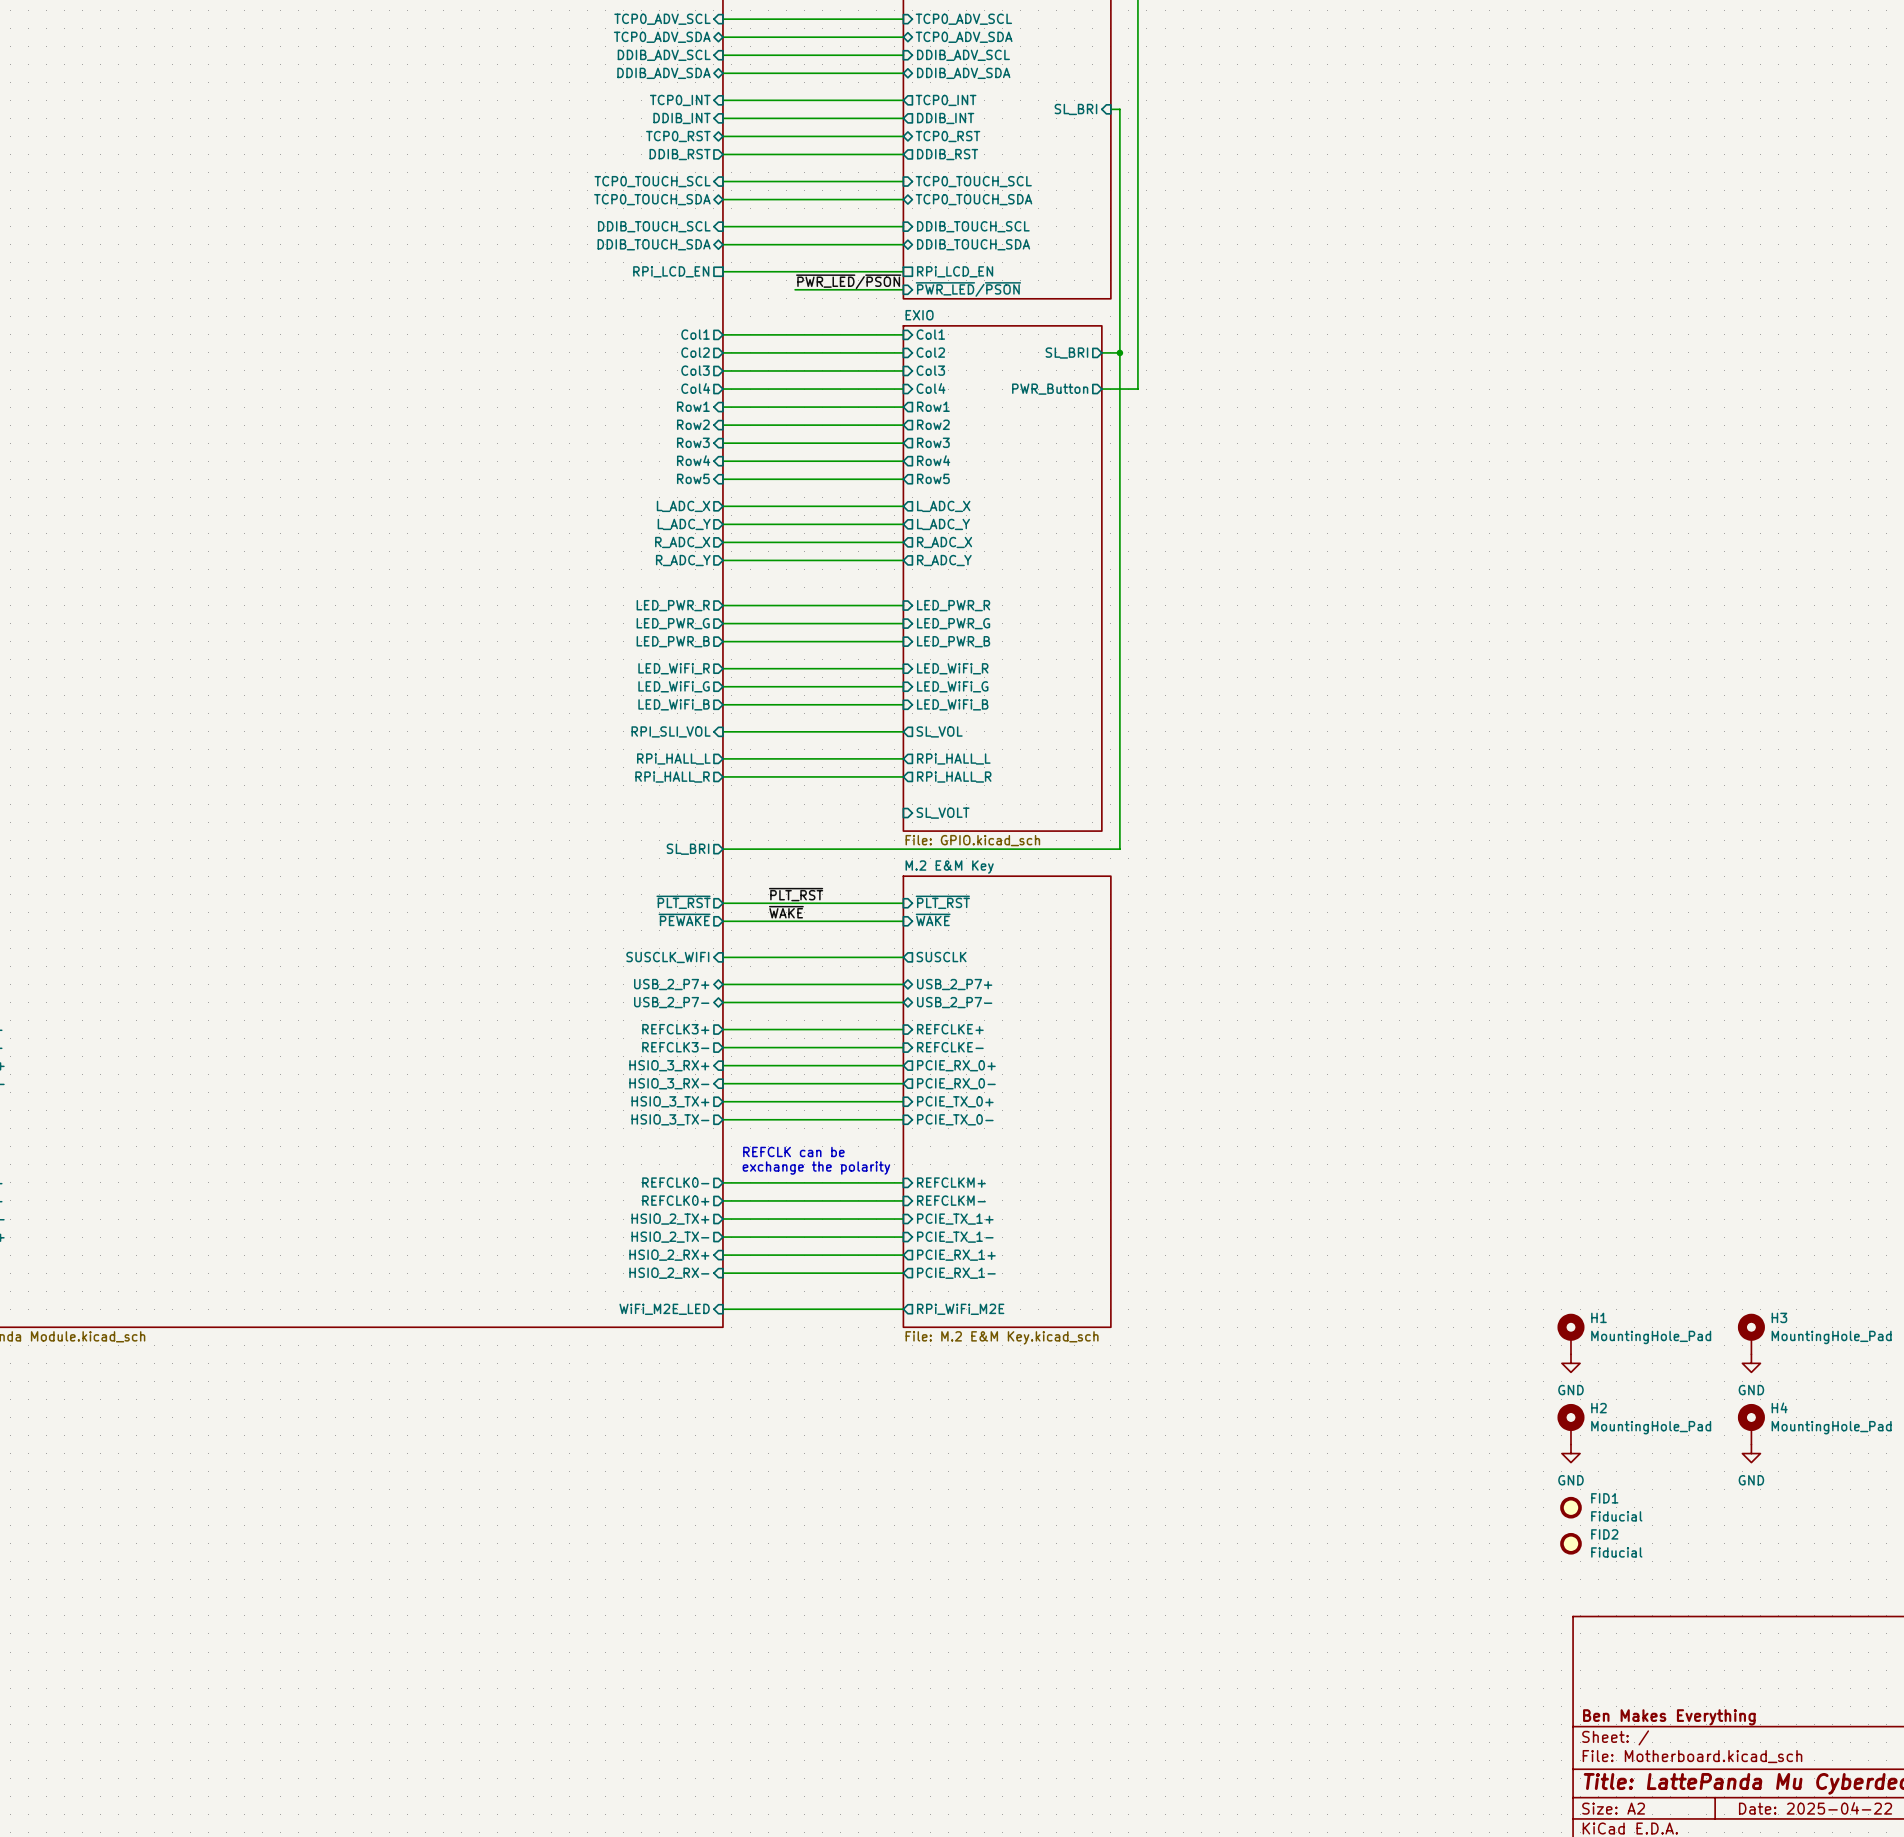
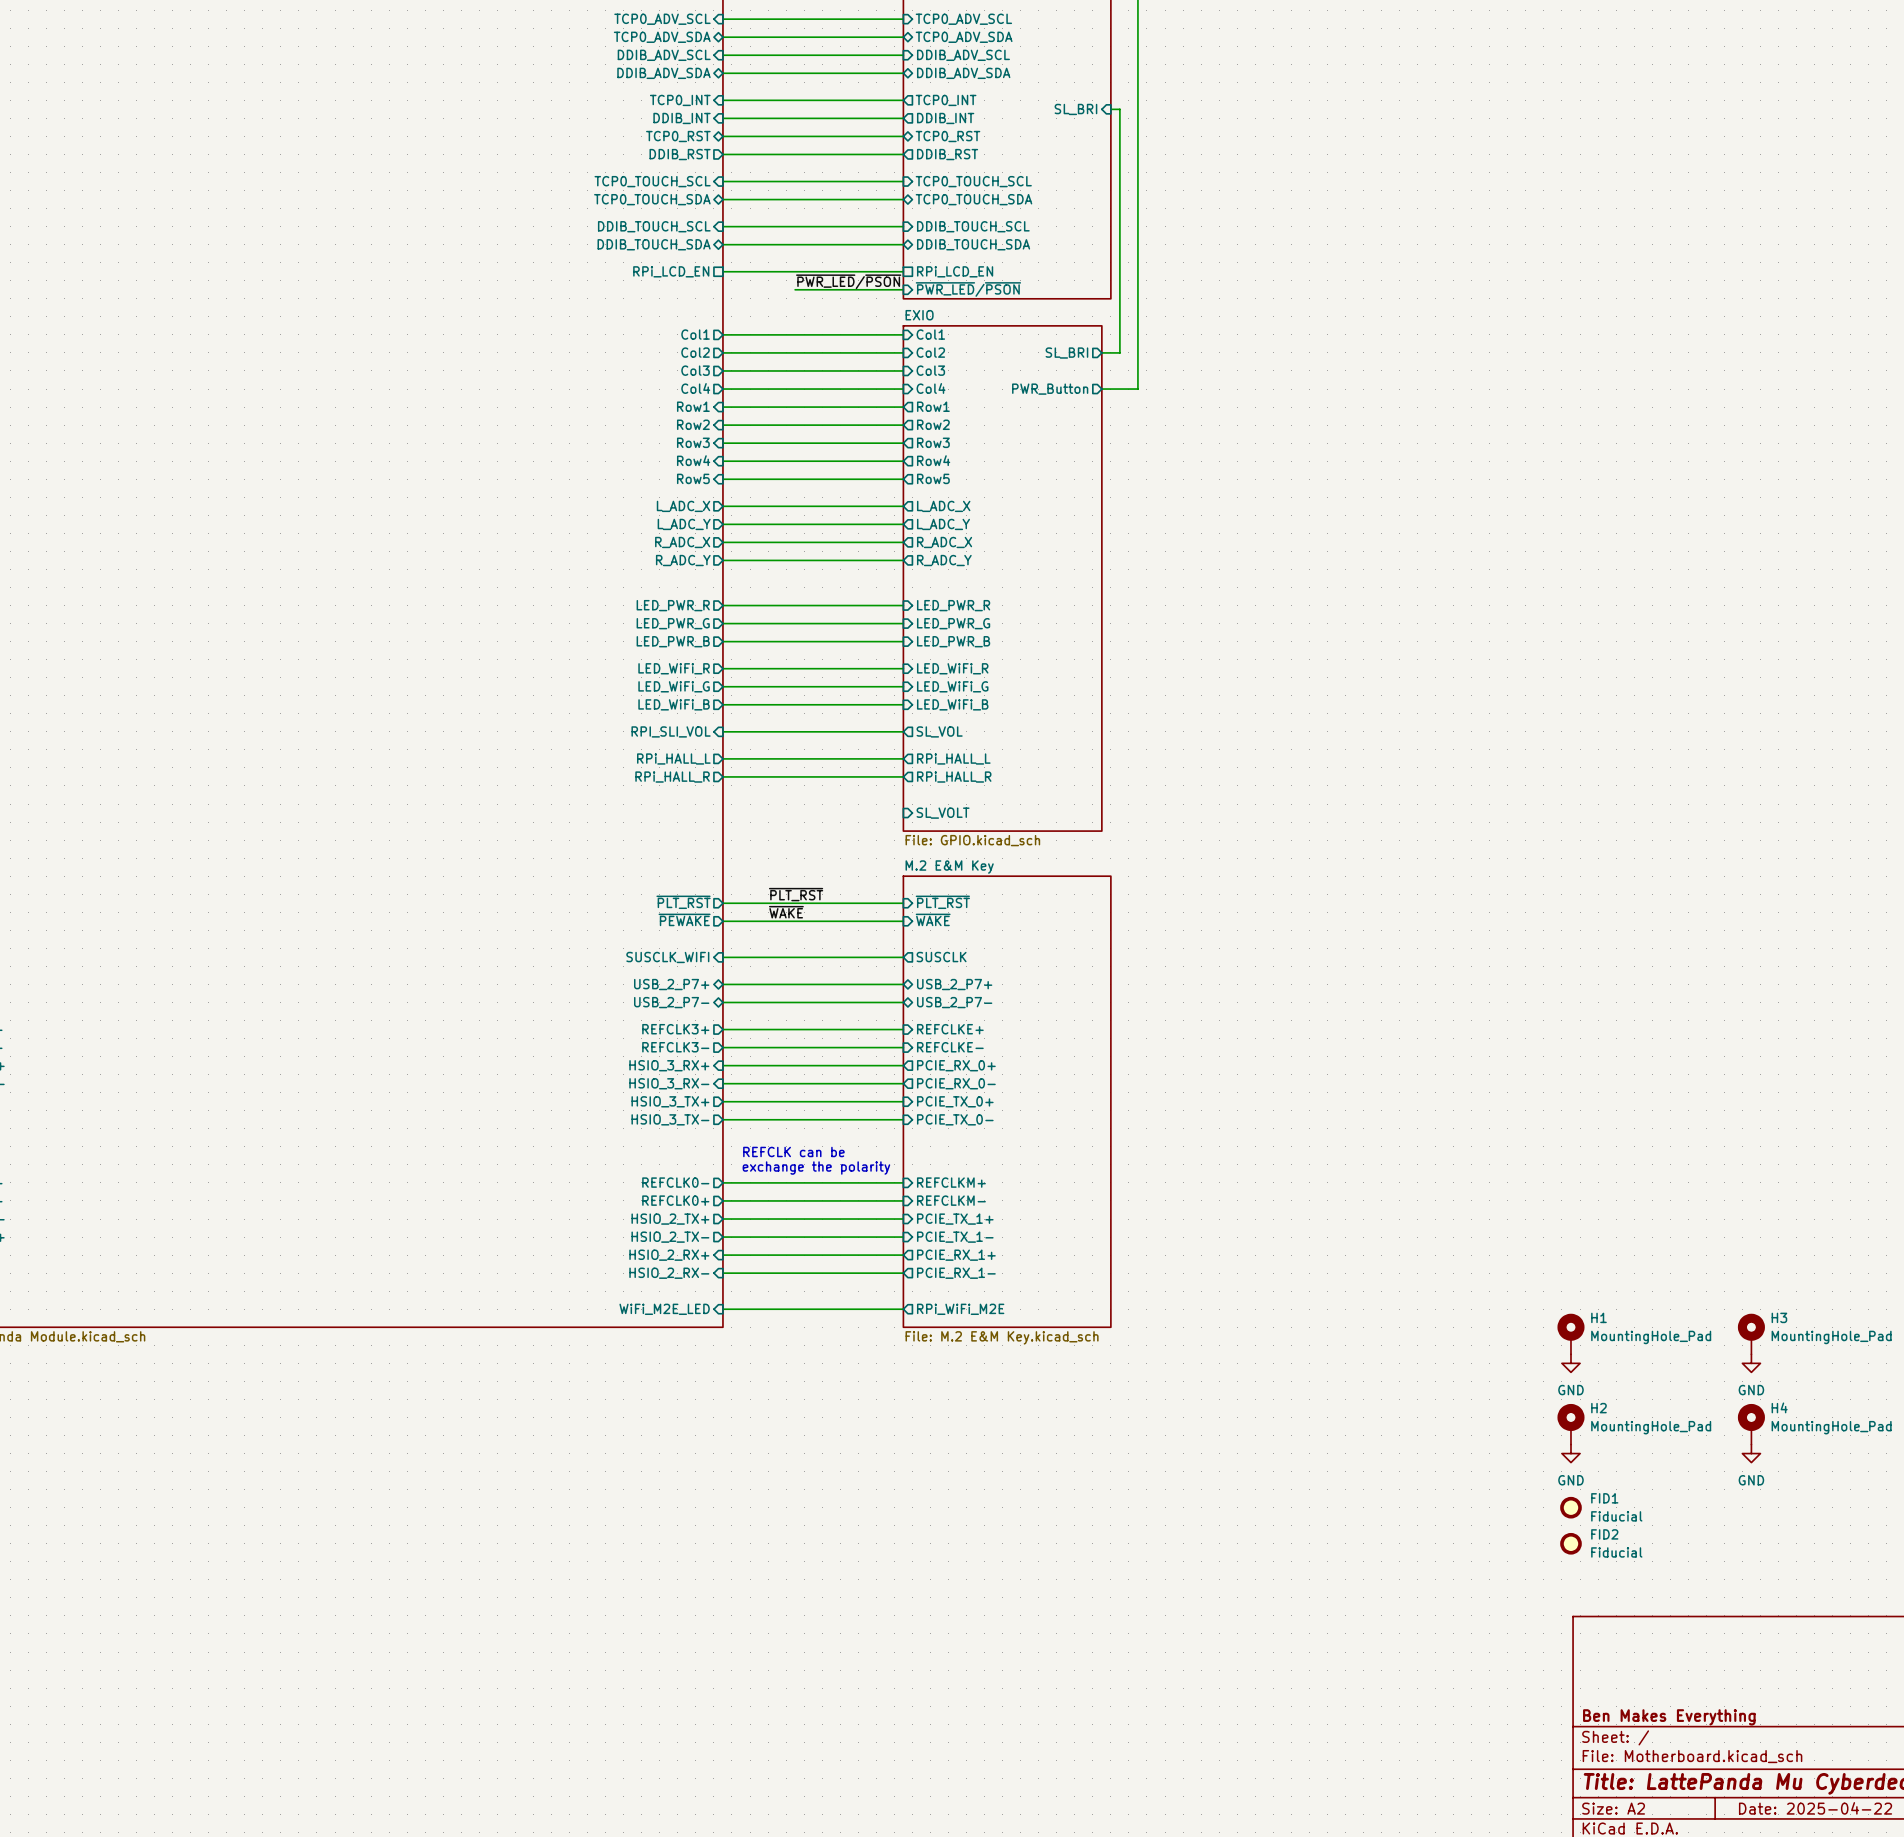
wire: (1119, 352) (1119, 849) (722, 849) -> none
junction: (1119, 352) -> none
sheet pin: SL_BRI (688, 849) -> none

